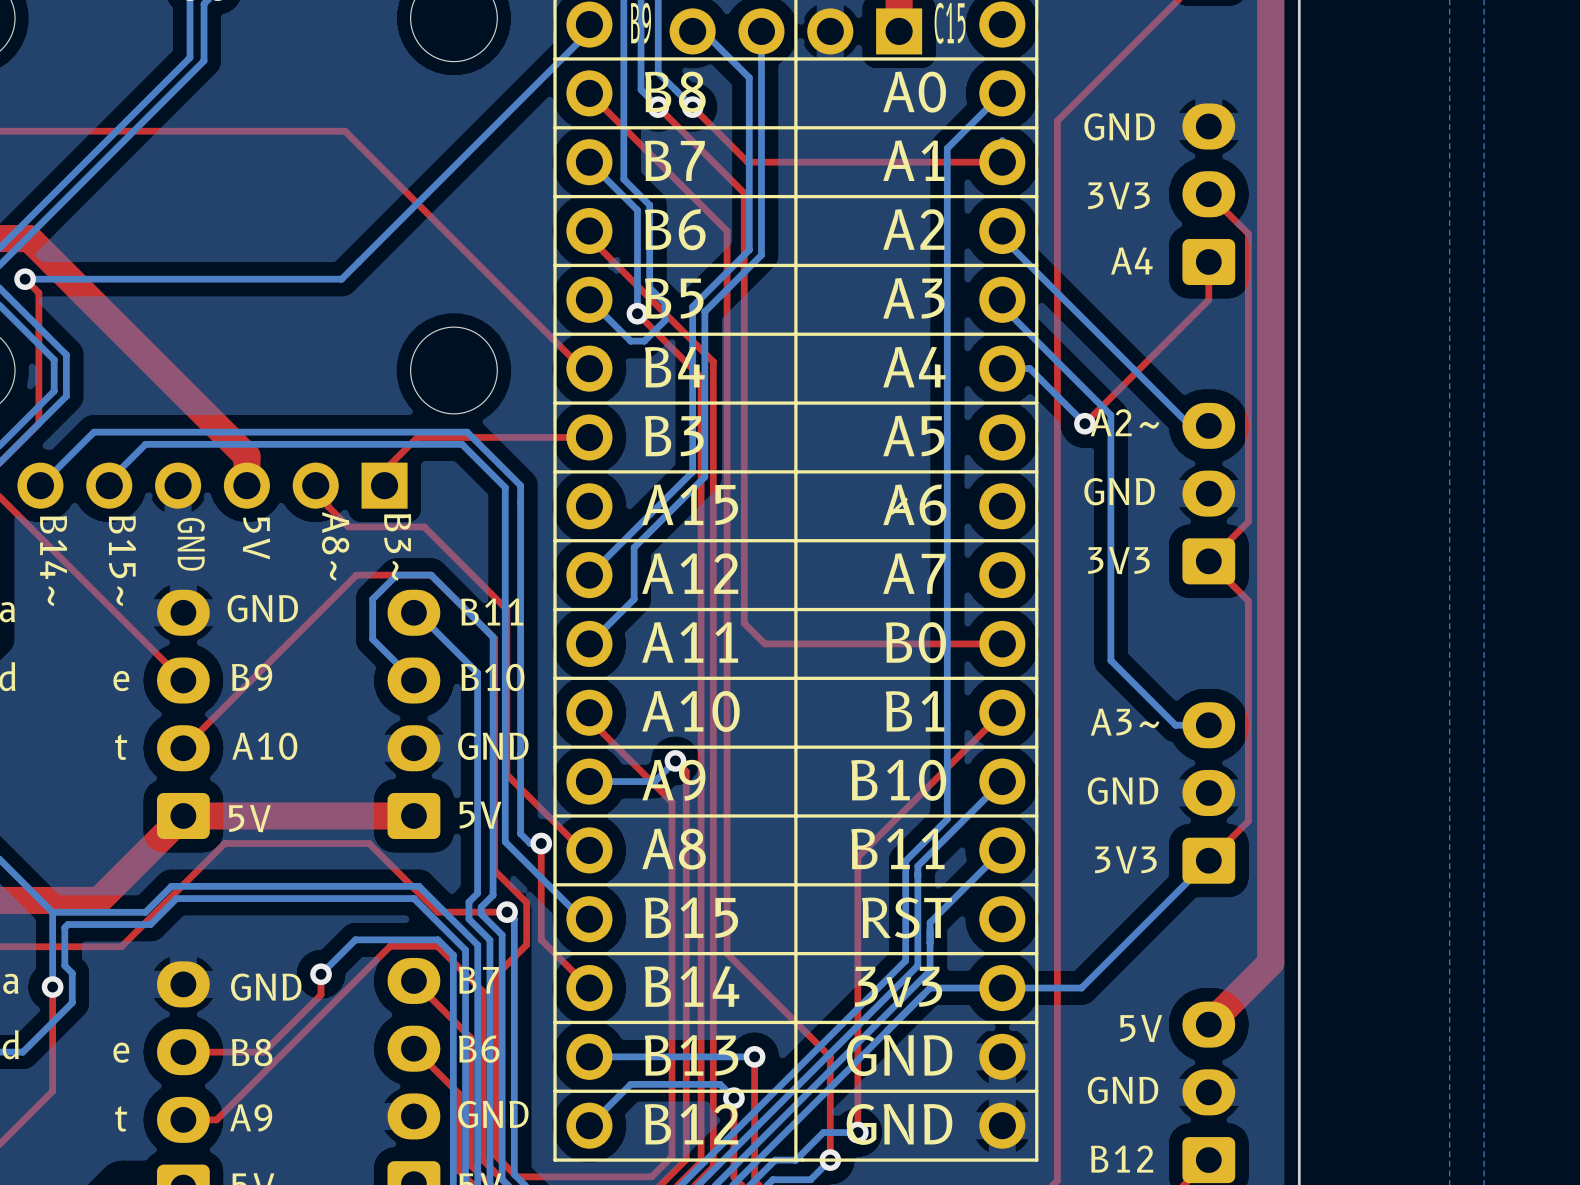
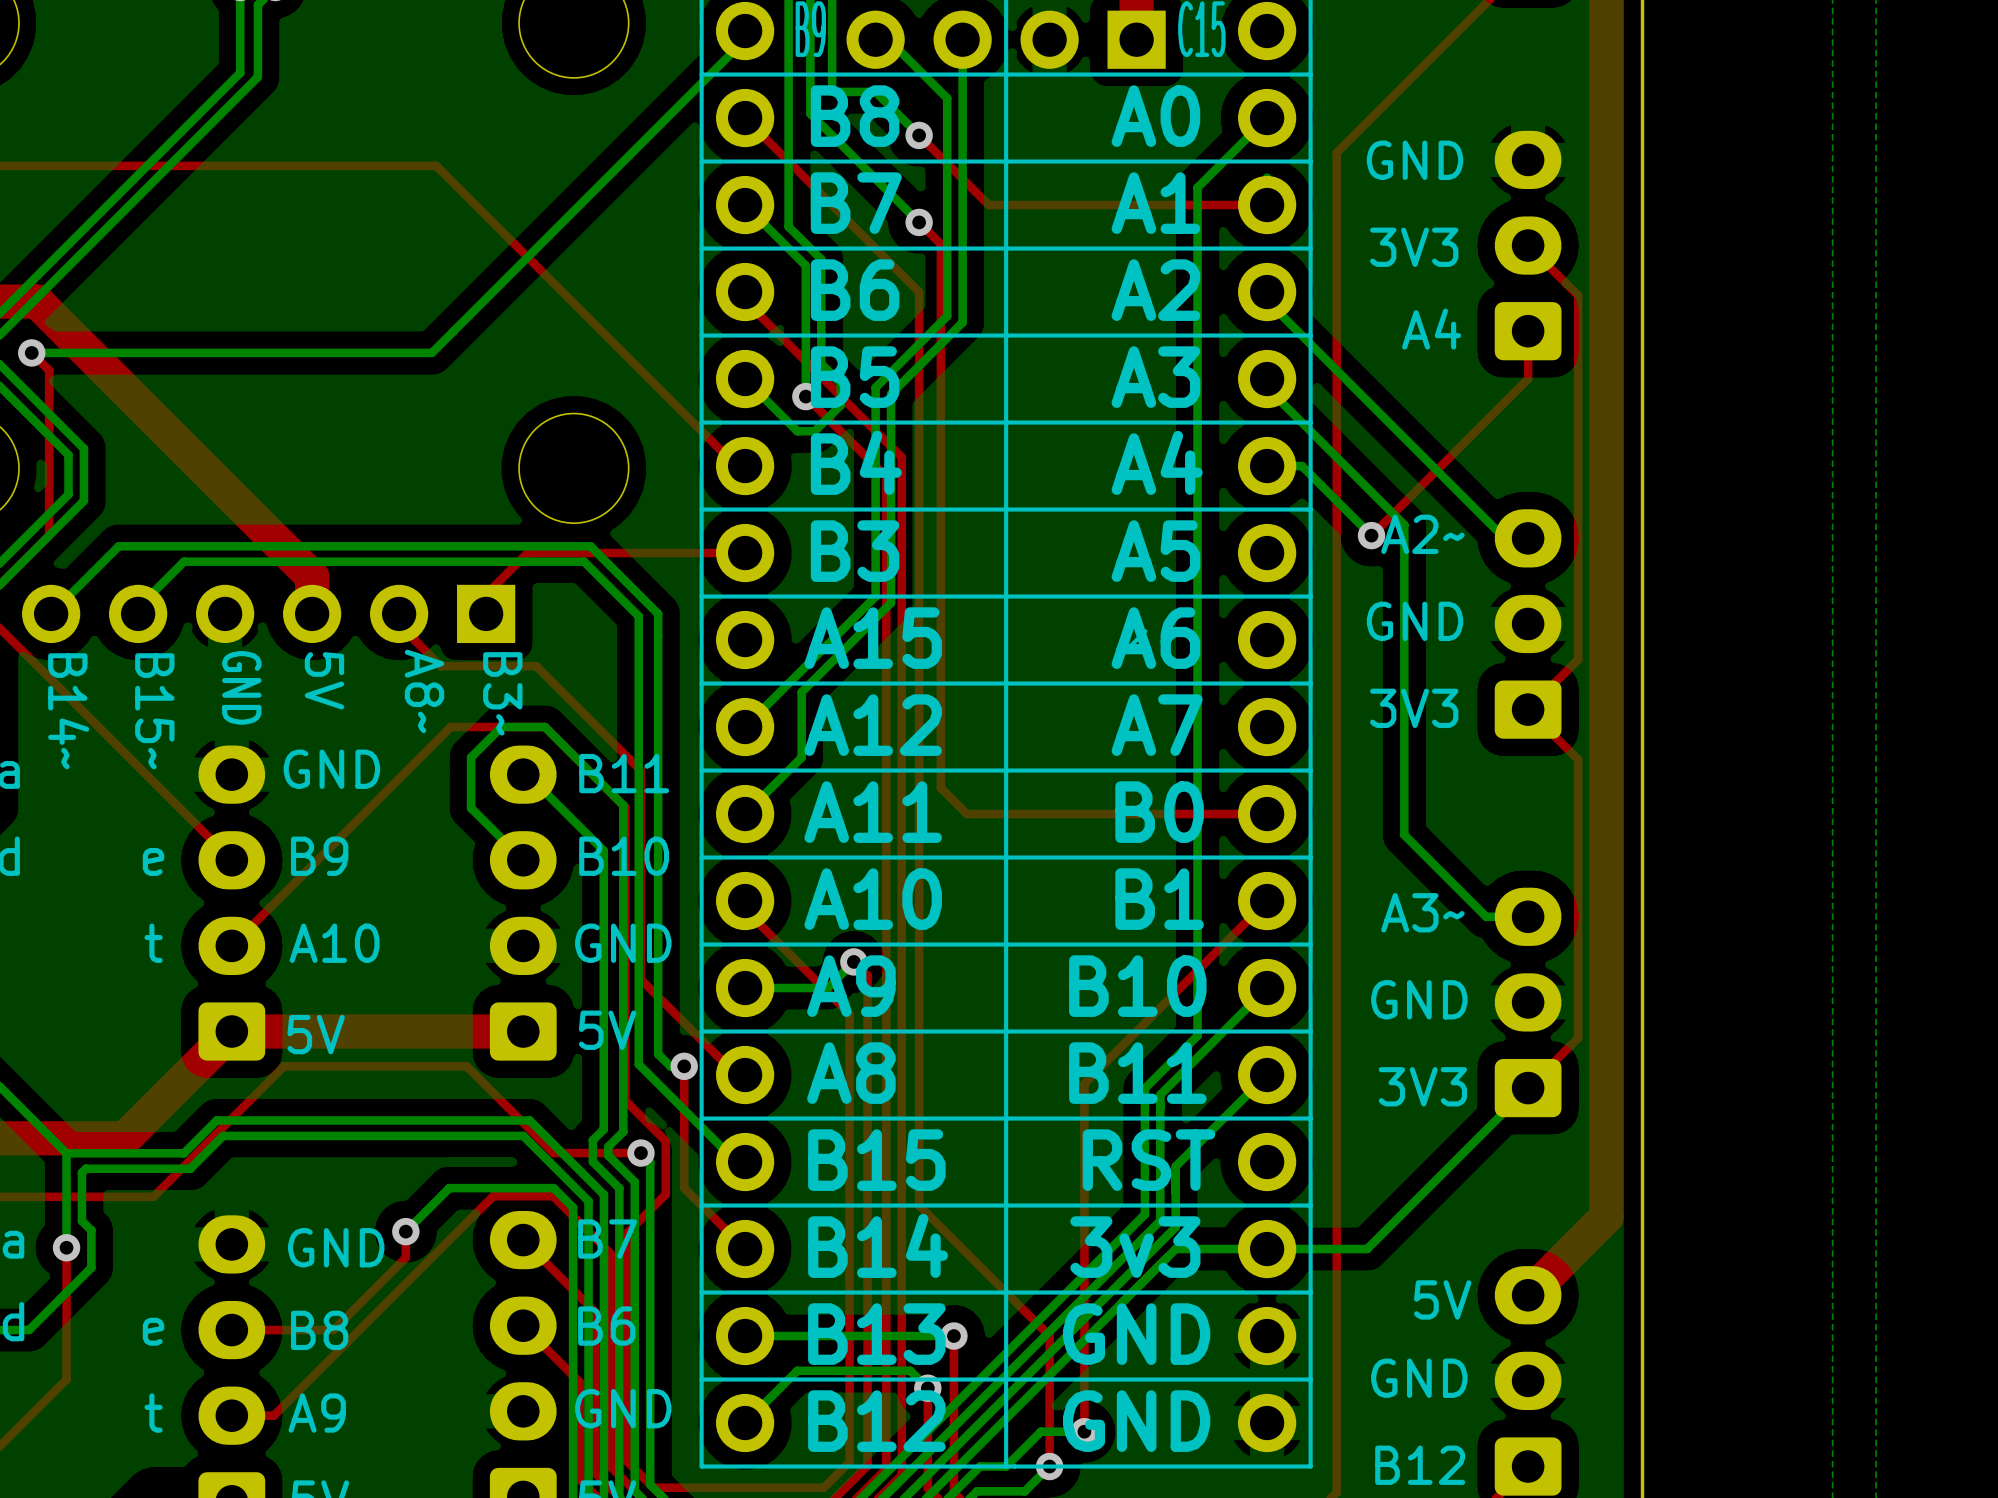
bottom track: (658, 72) (692, 107) -> (832, 91) (875, 91) (919, 135)
bottom track: none -> (832, 135) (919, 222)
top track: (658, 107) (727, 175) -> none
via: (658, 107) -> none
top track: (692, 107) (747, 162) (782, 162) -> (919, 135) (988, 205)
via: (692, 107) -> none
via: none -> (919, 135)
via: none -> (919, 222)

